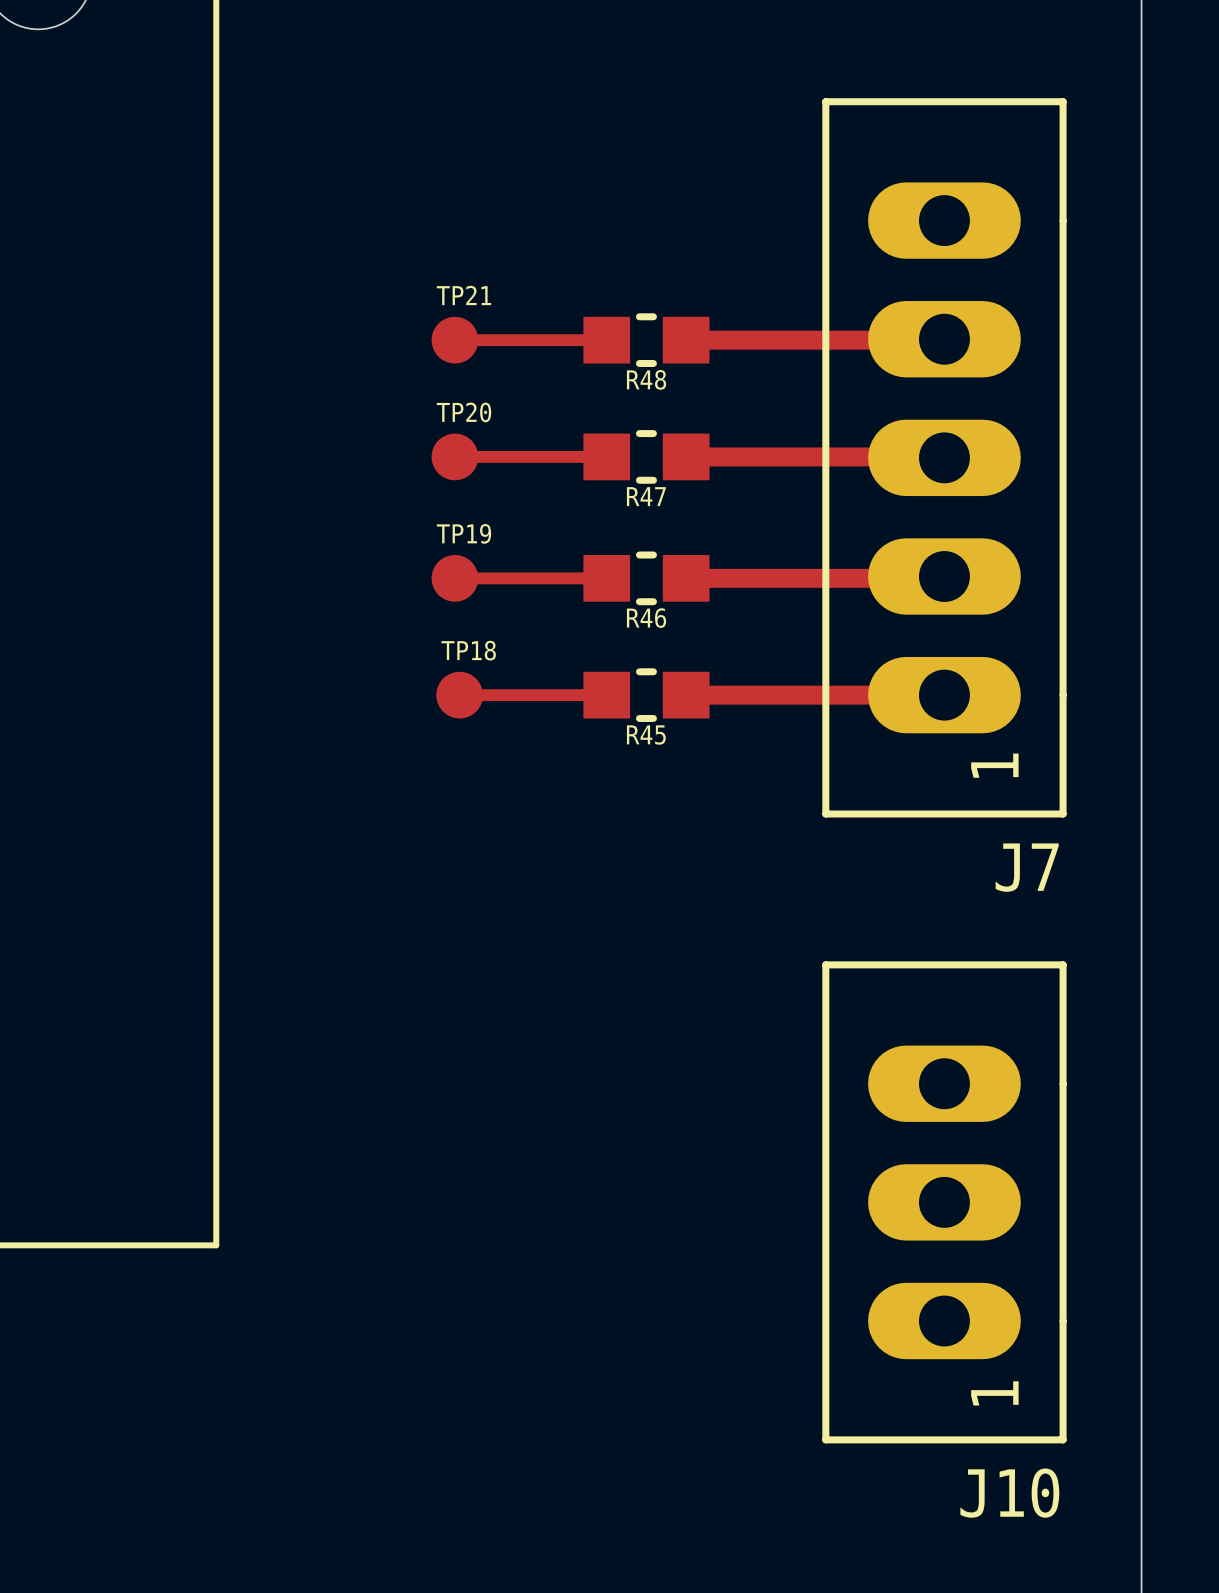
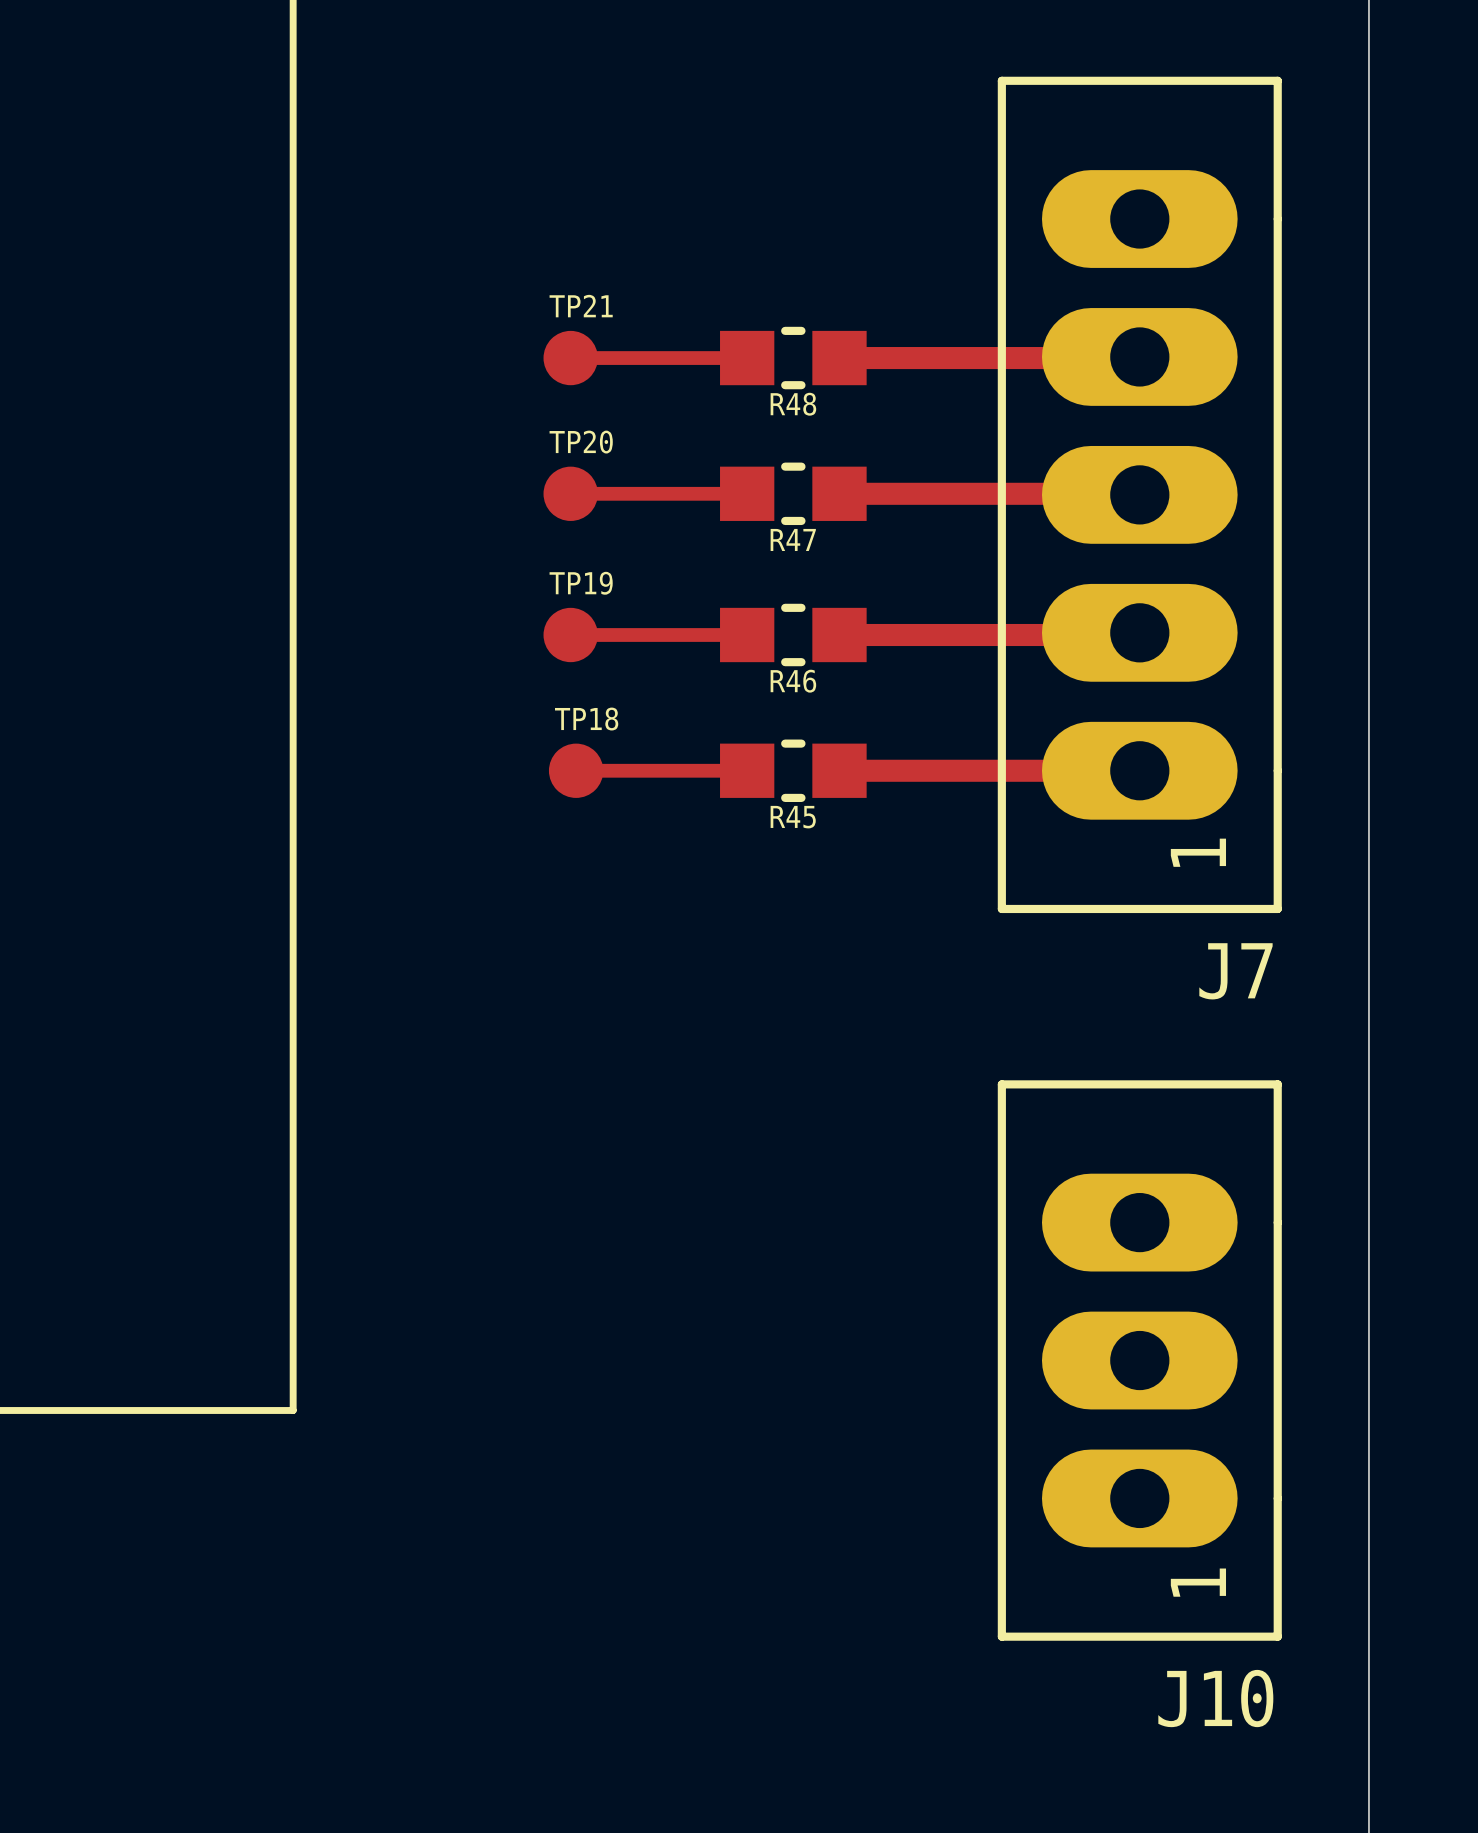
J7 footprint: [822, 98, 1067, 818] -> [997, 76, 1282, 914]
J10 footprint: [822, 961, 1067, 1444] -> [997, 1080, 1282, 1641]

